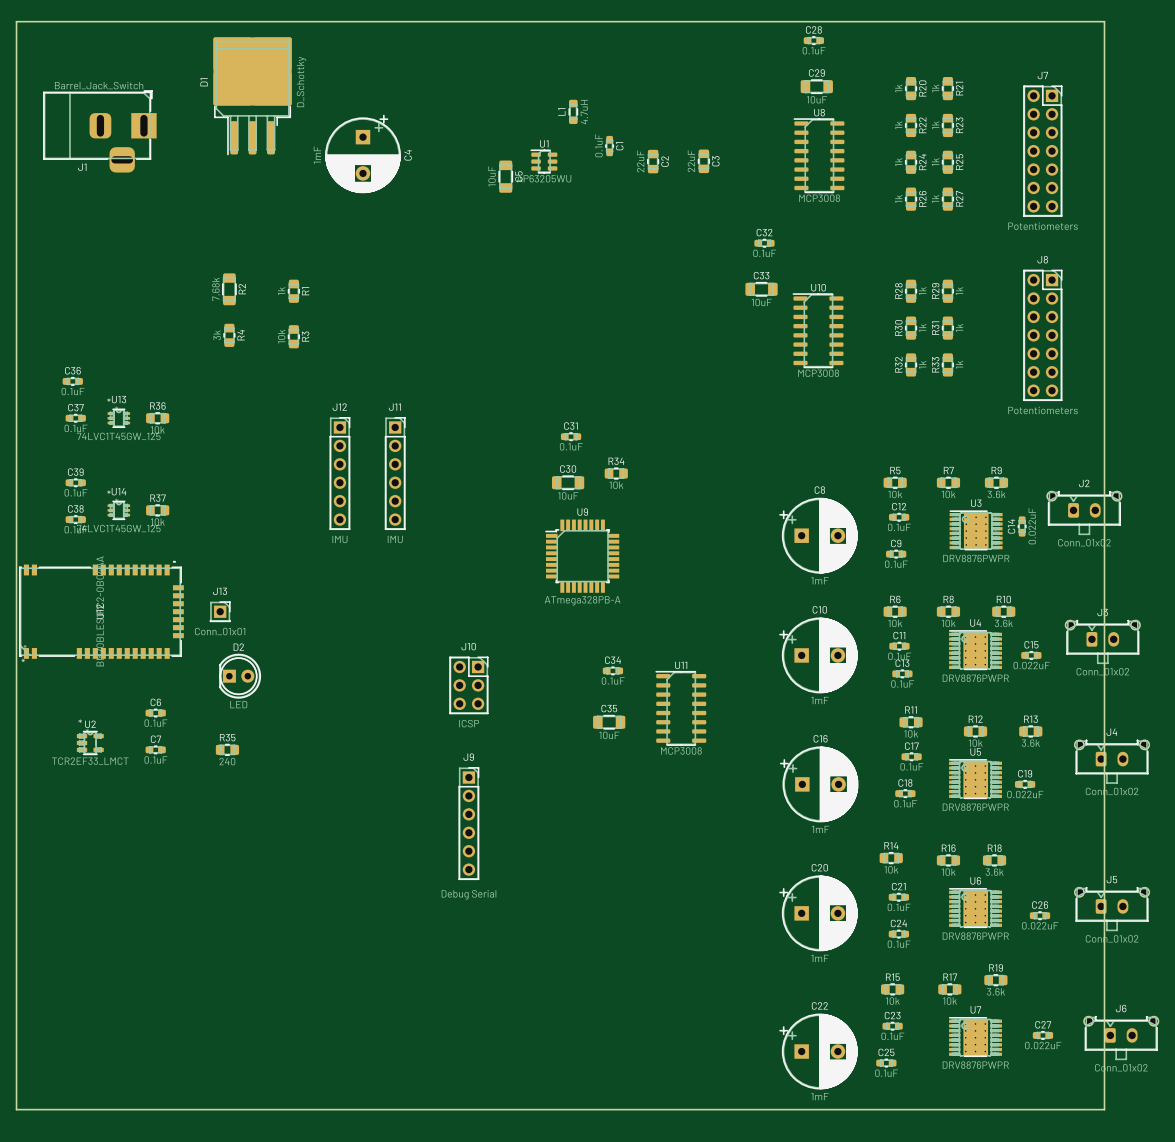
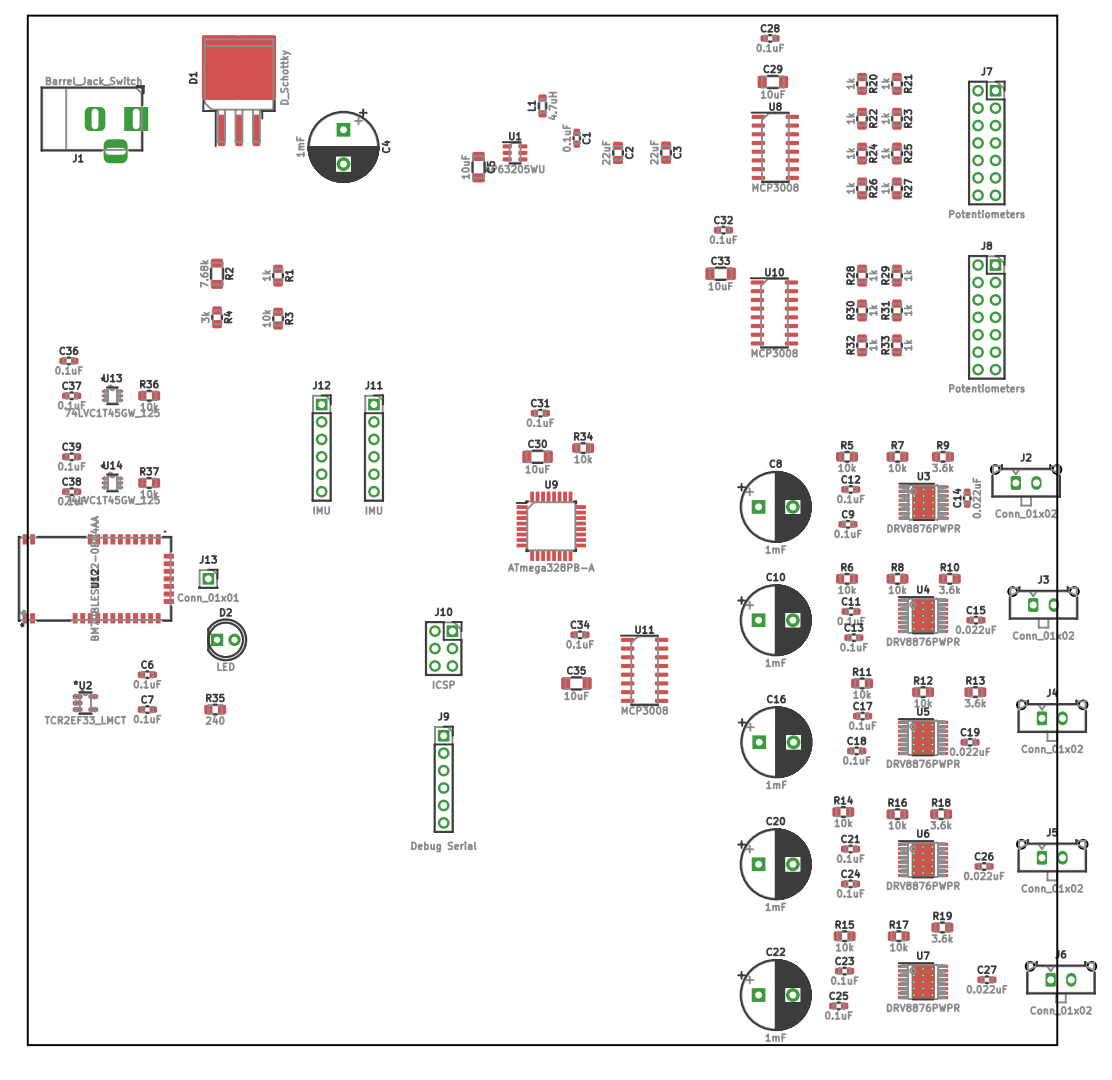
board edge: (16, 21) (1104, 21) (1104, 1109) (16, 1109) (16, 21) -> (27, 15) (1057, 15) (1057, 1045) (27, 1045) (27, 15)

